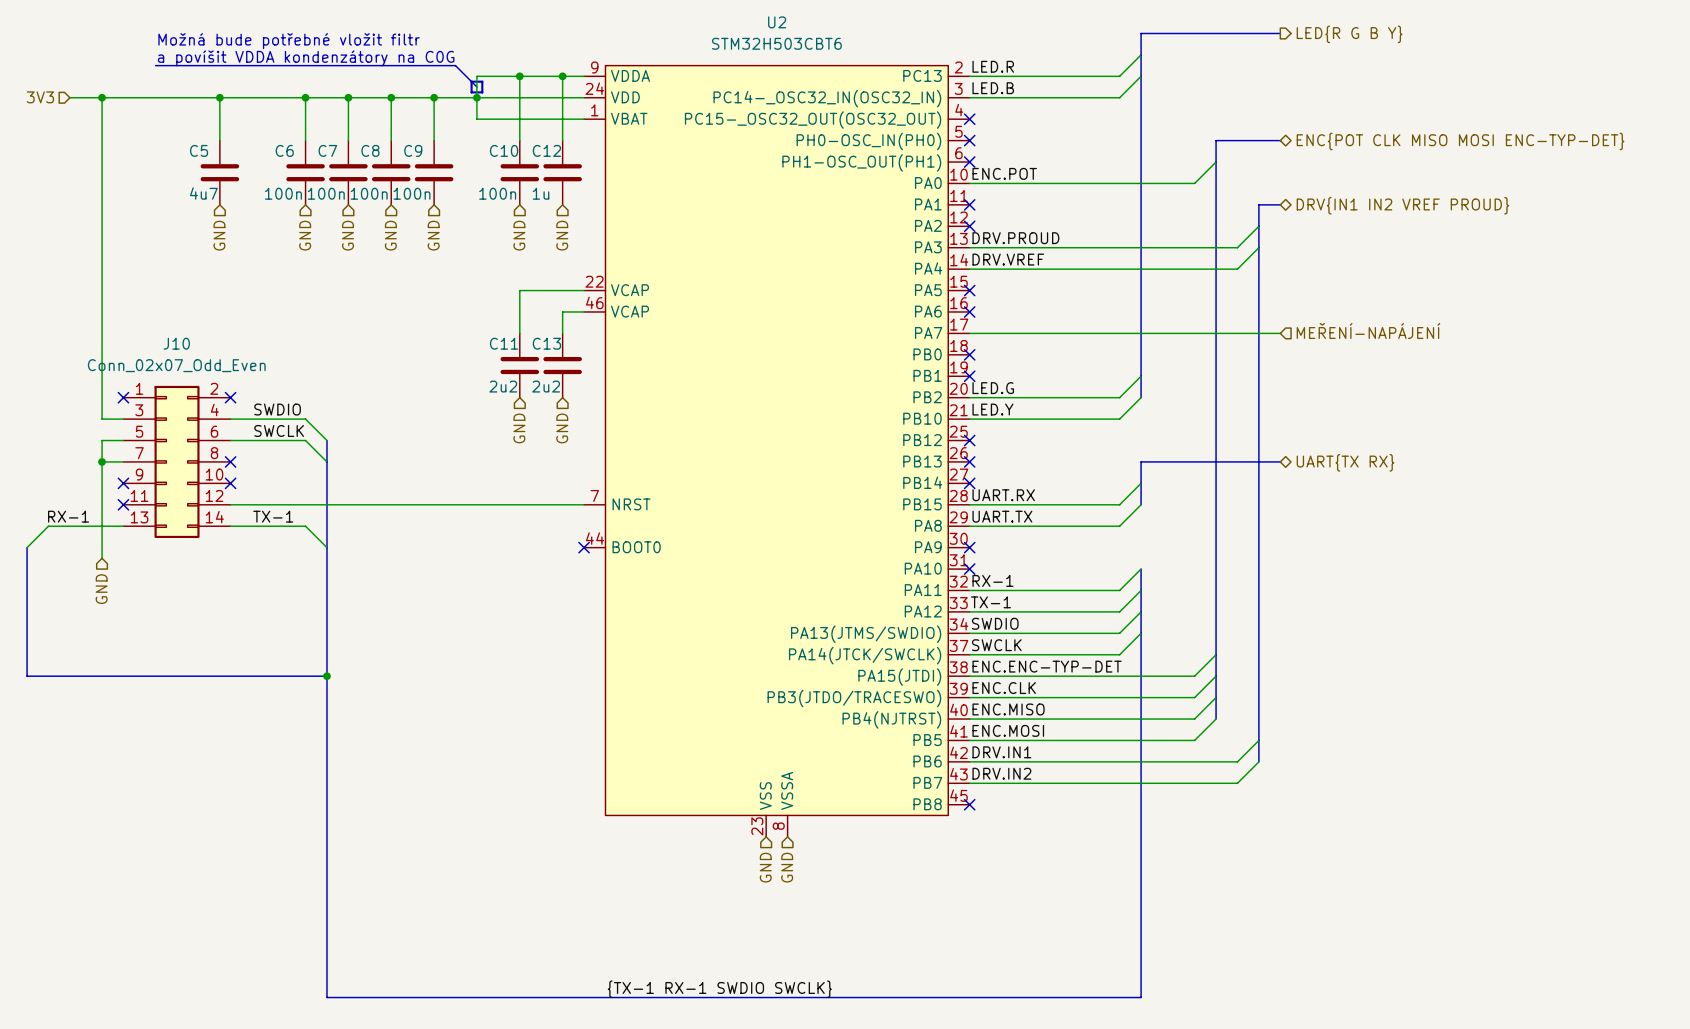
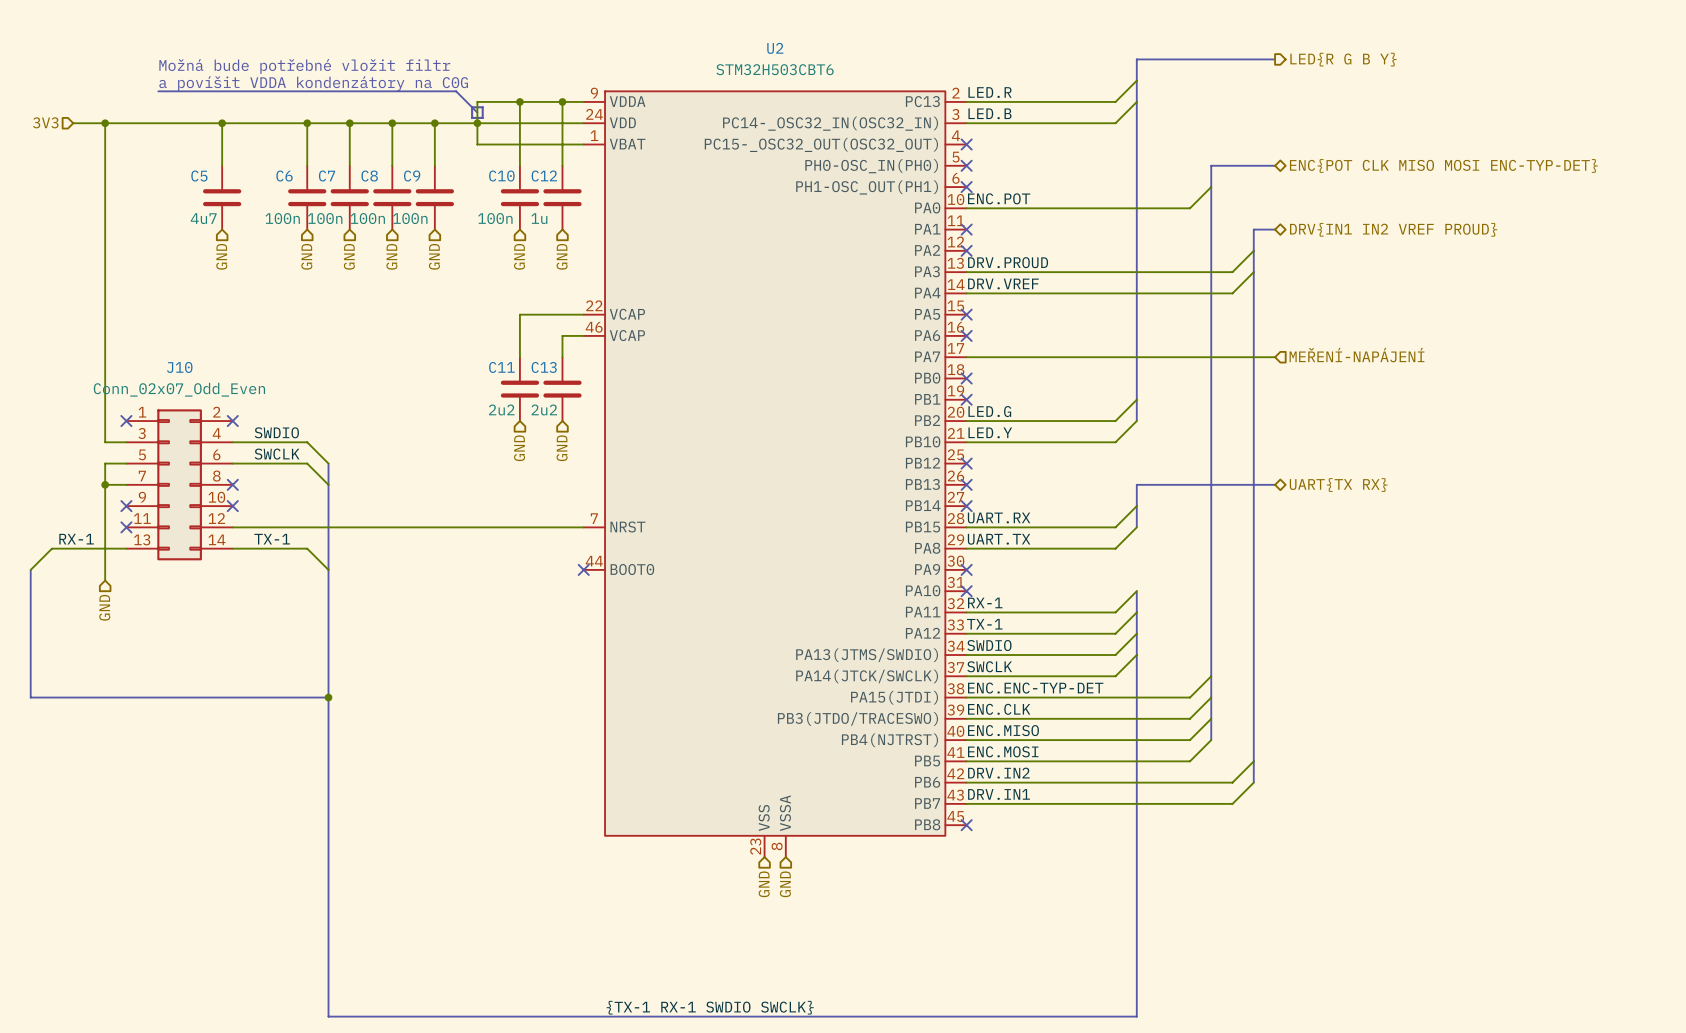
label: DRV.IN1 (1001, 752) -> DRV.IN2 (998, 773)
label: DRV.IN2 (1001, 773) -> DRV.IN1 (998, 794)

